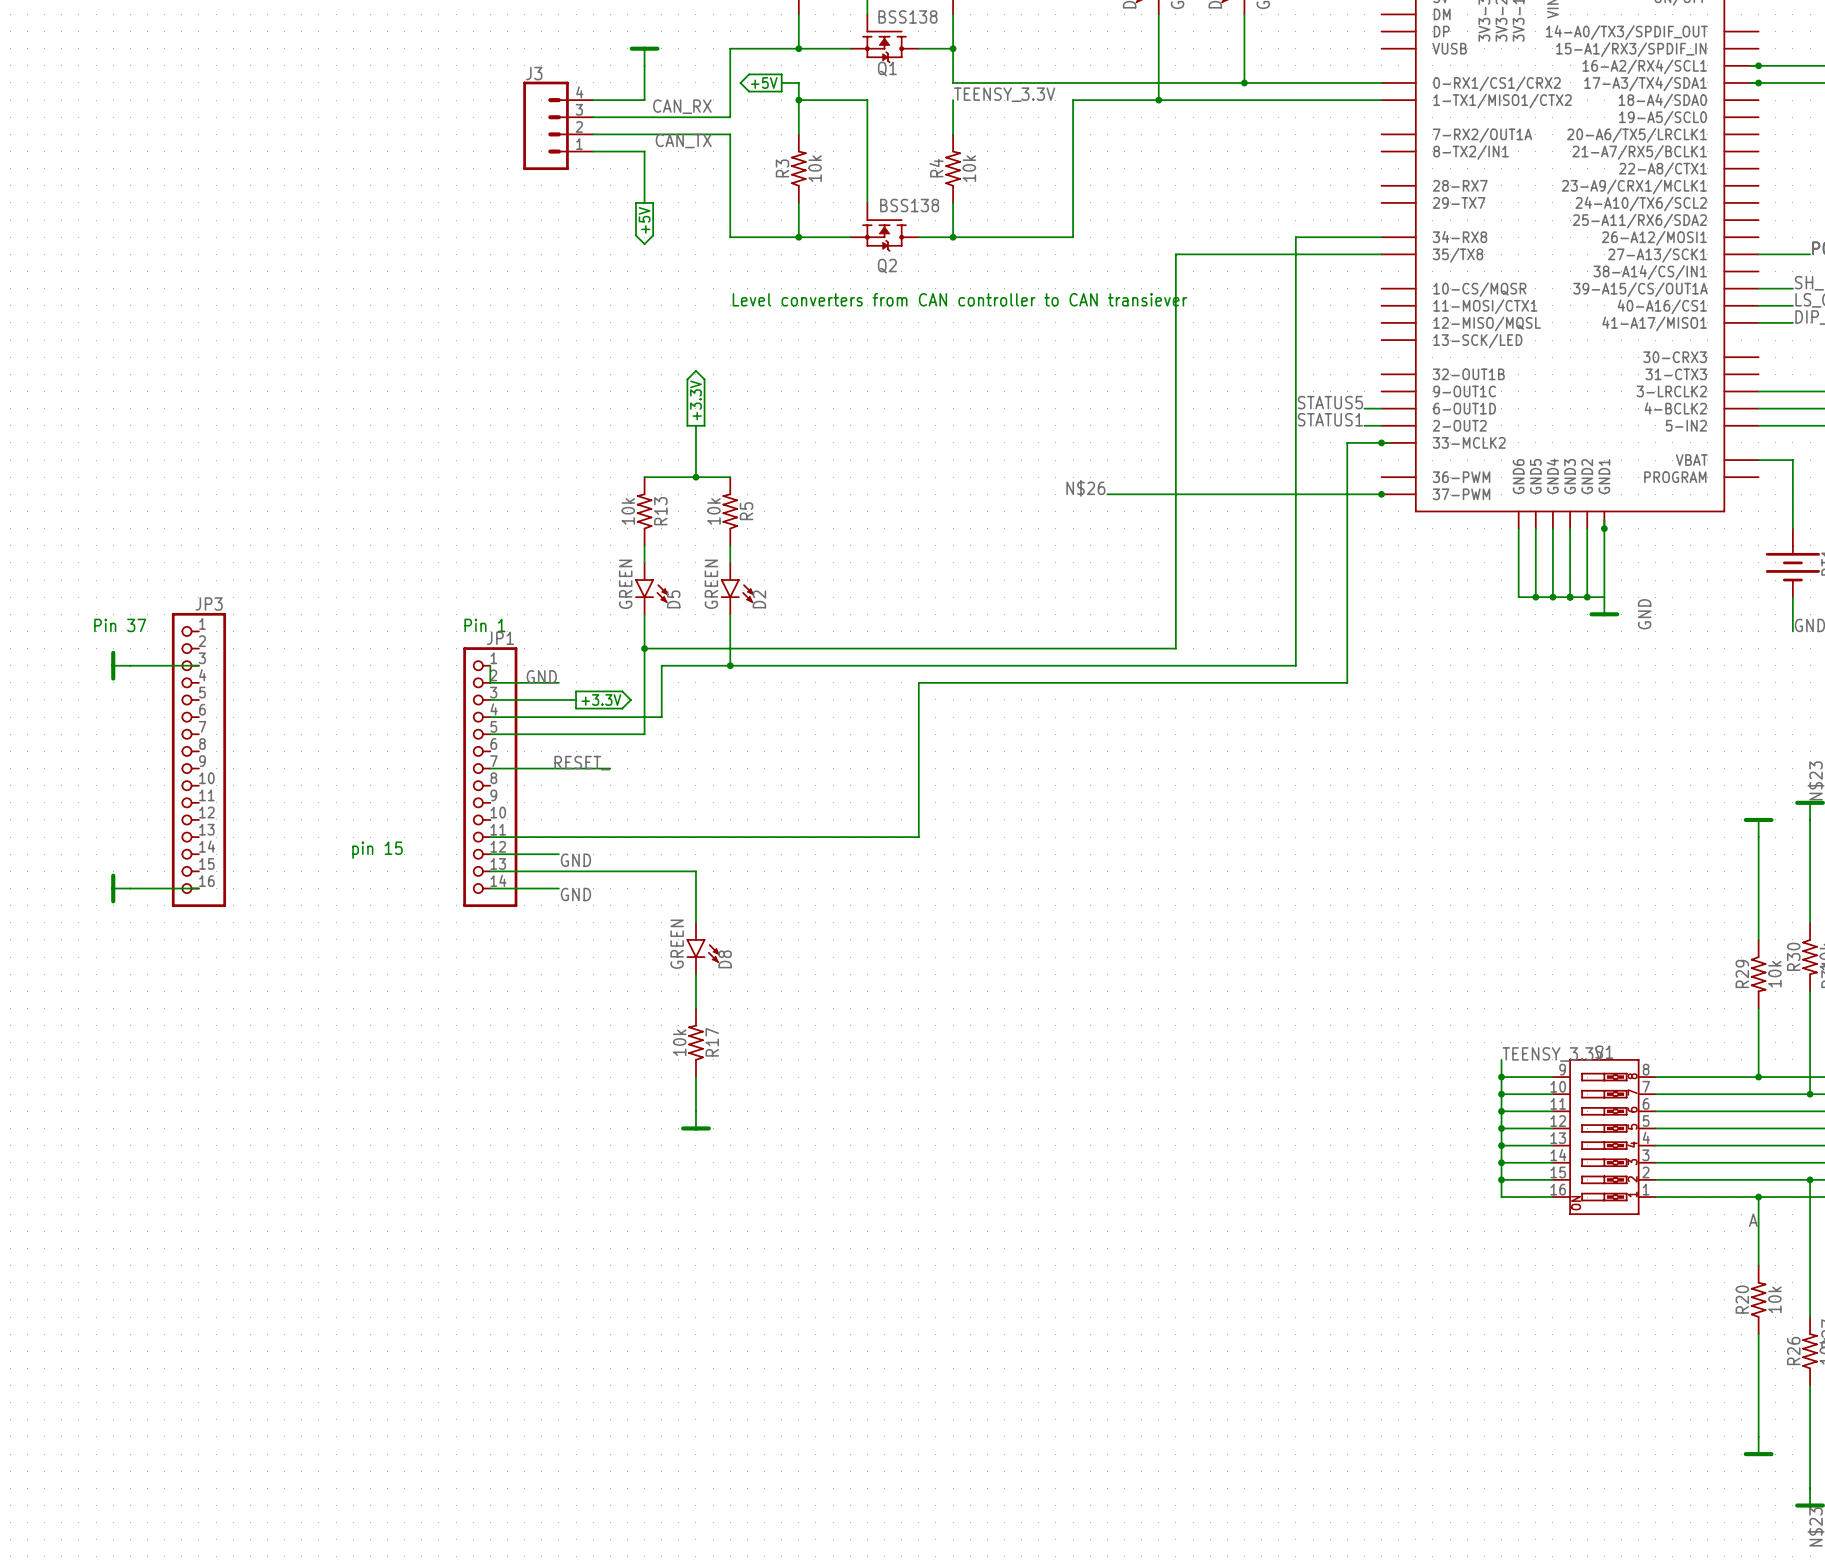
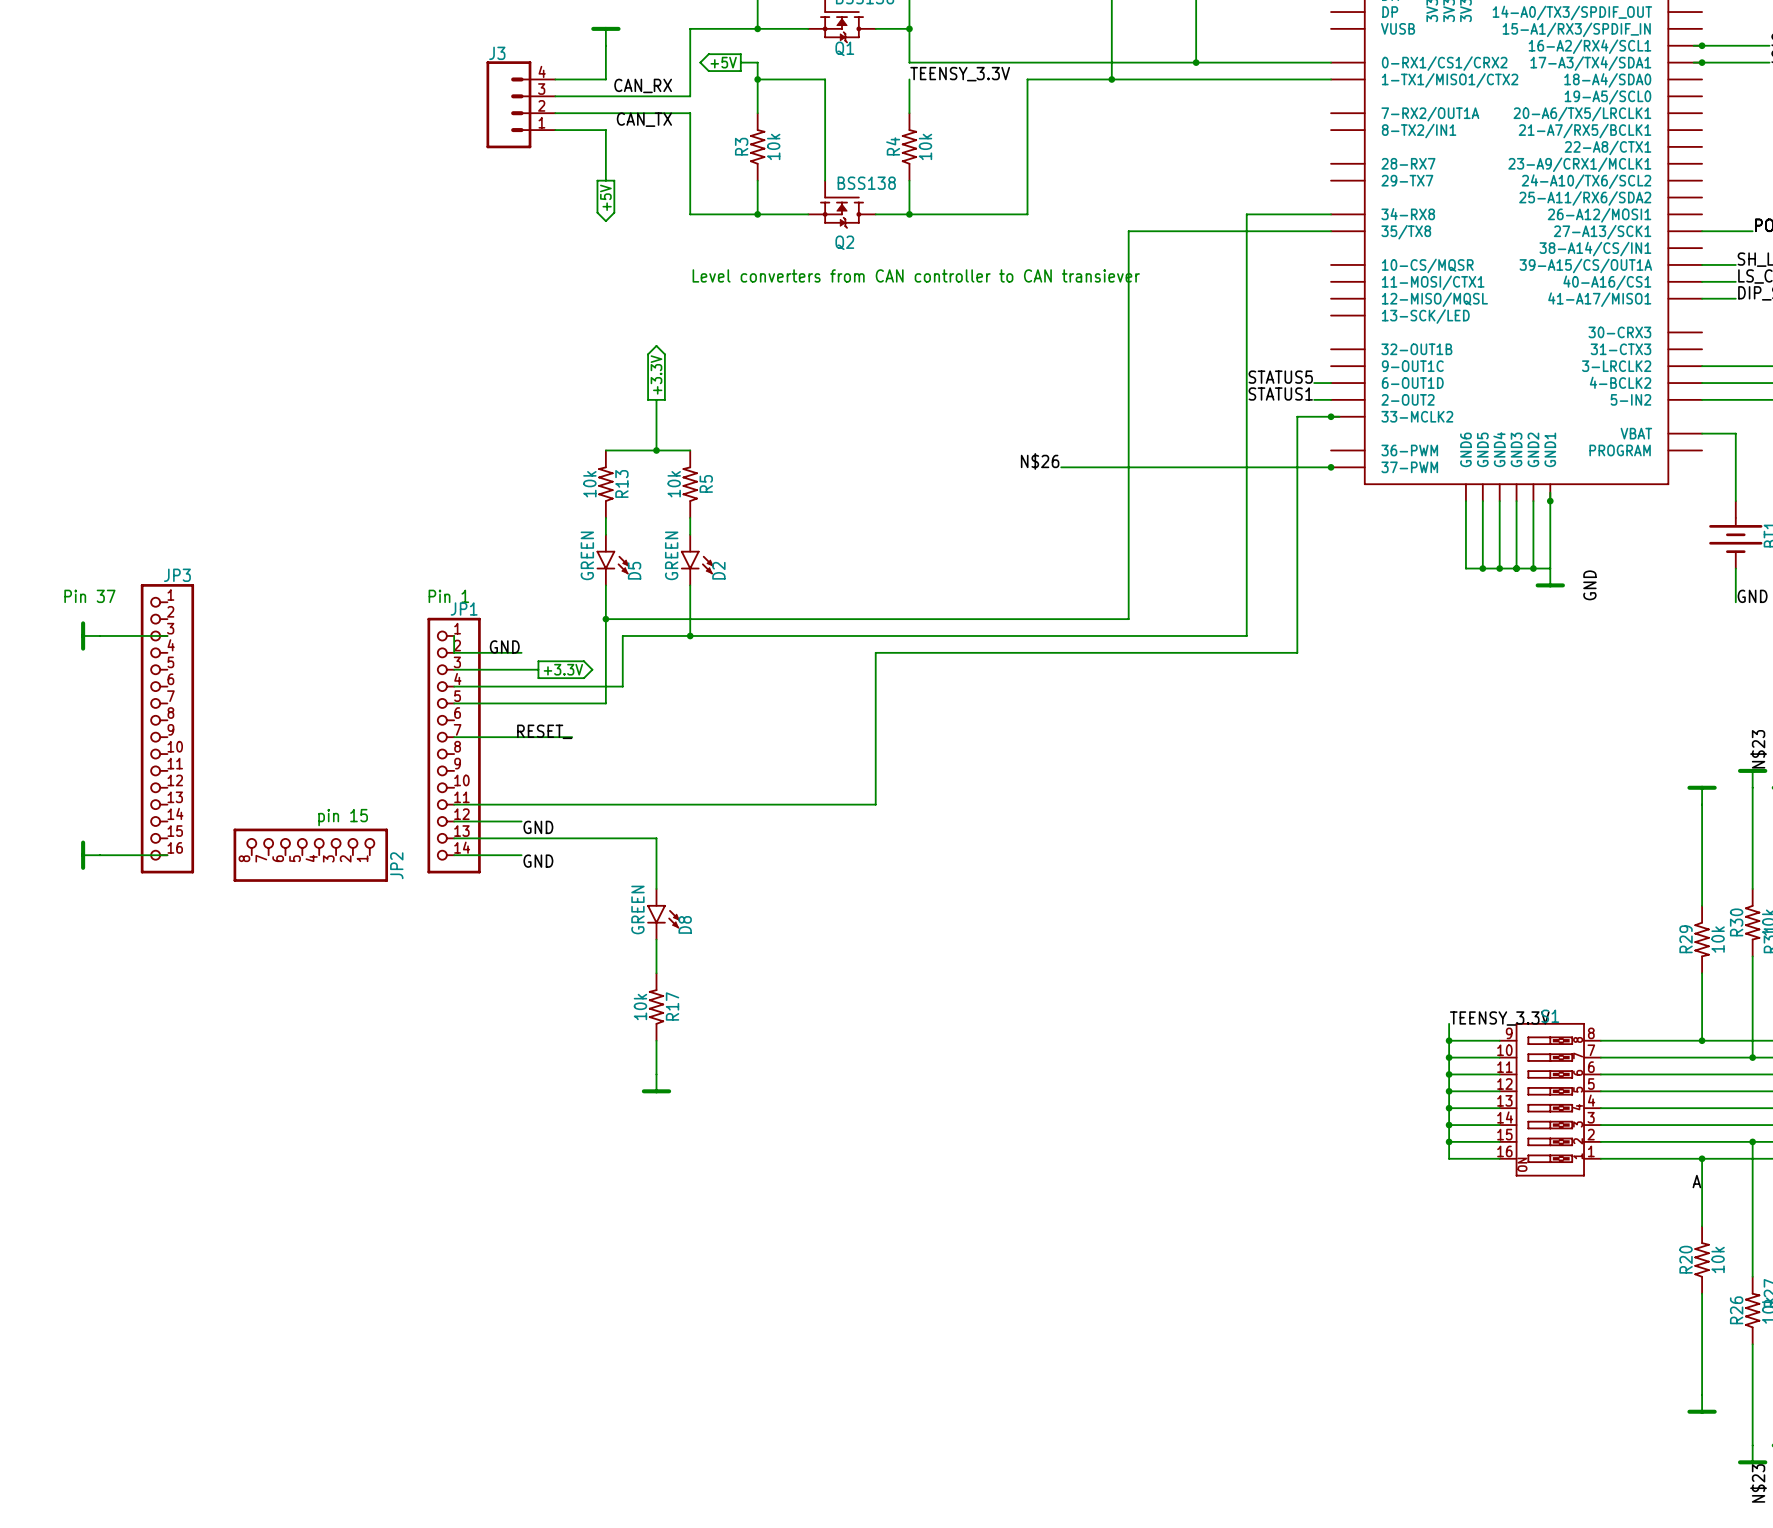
JP2: none -> (310, 855)

